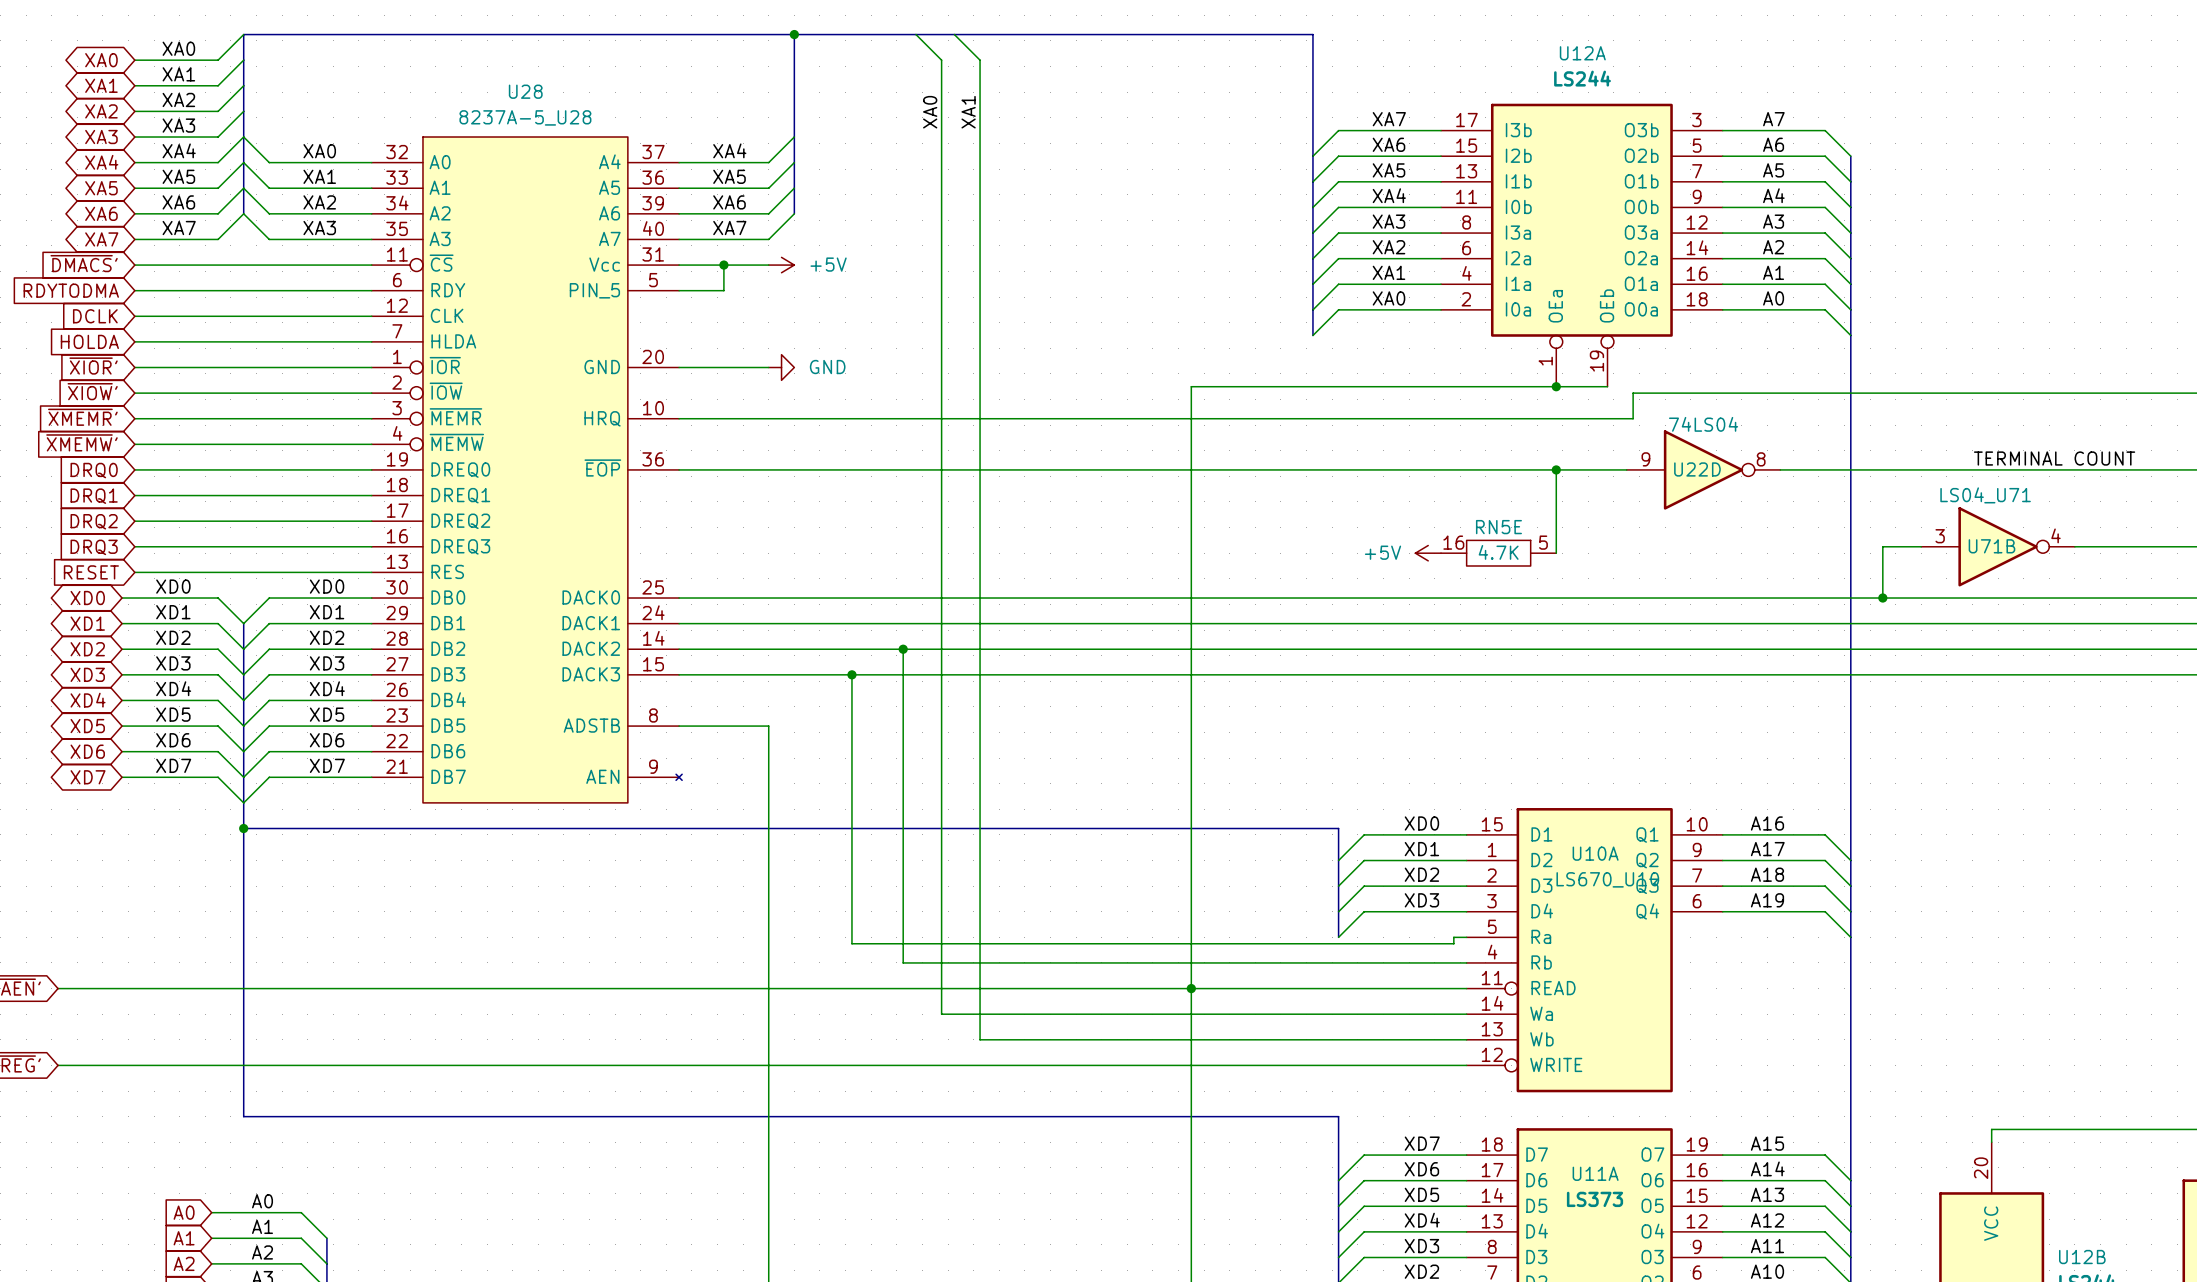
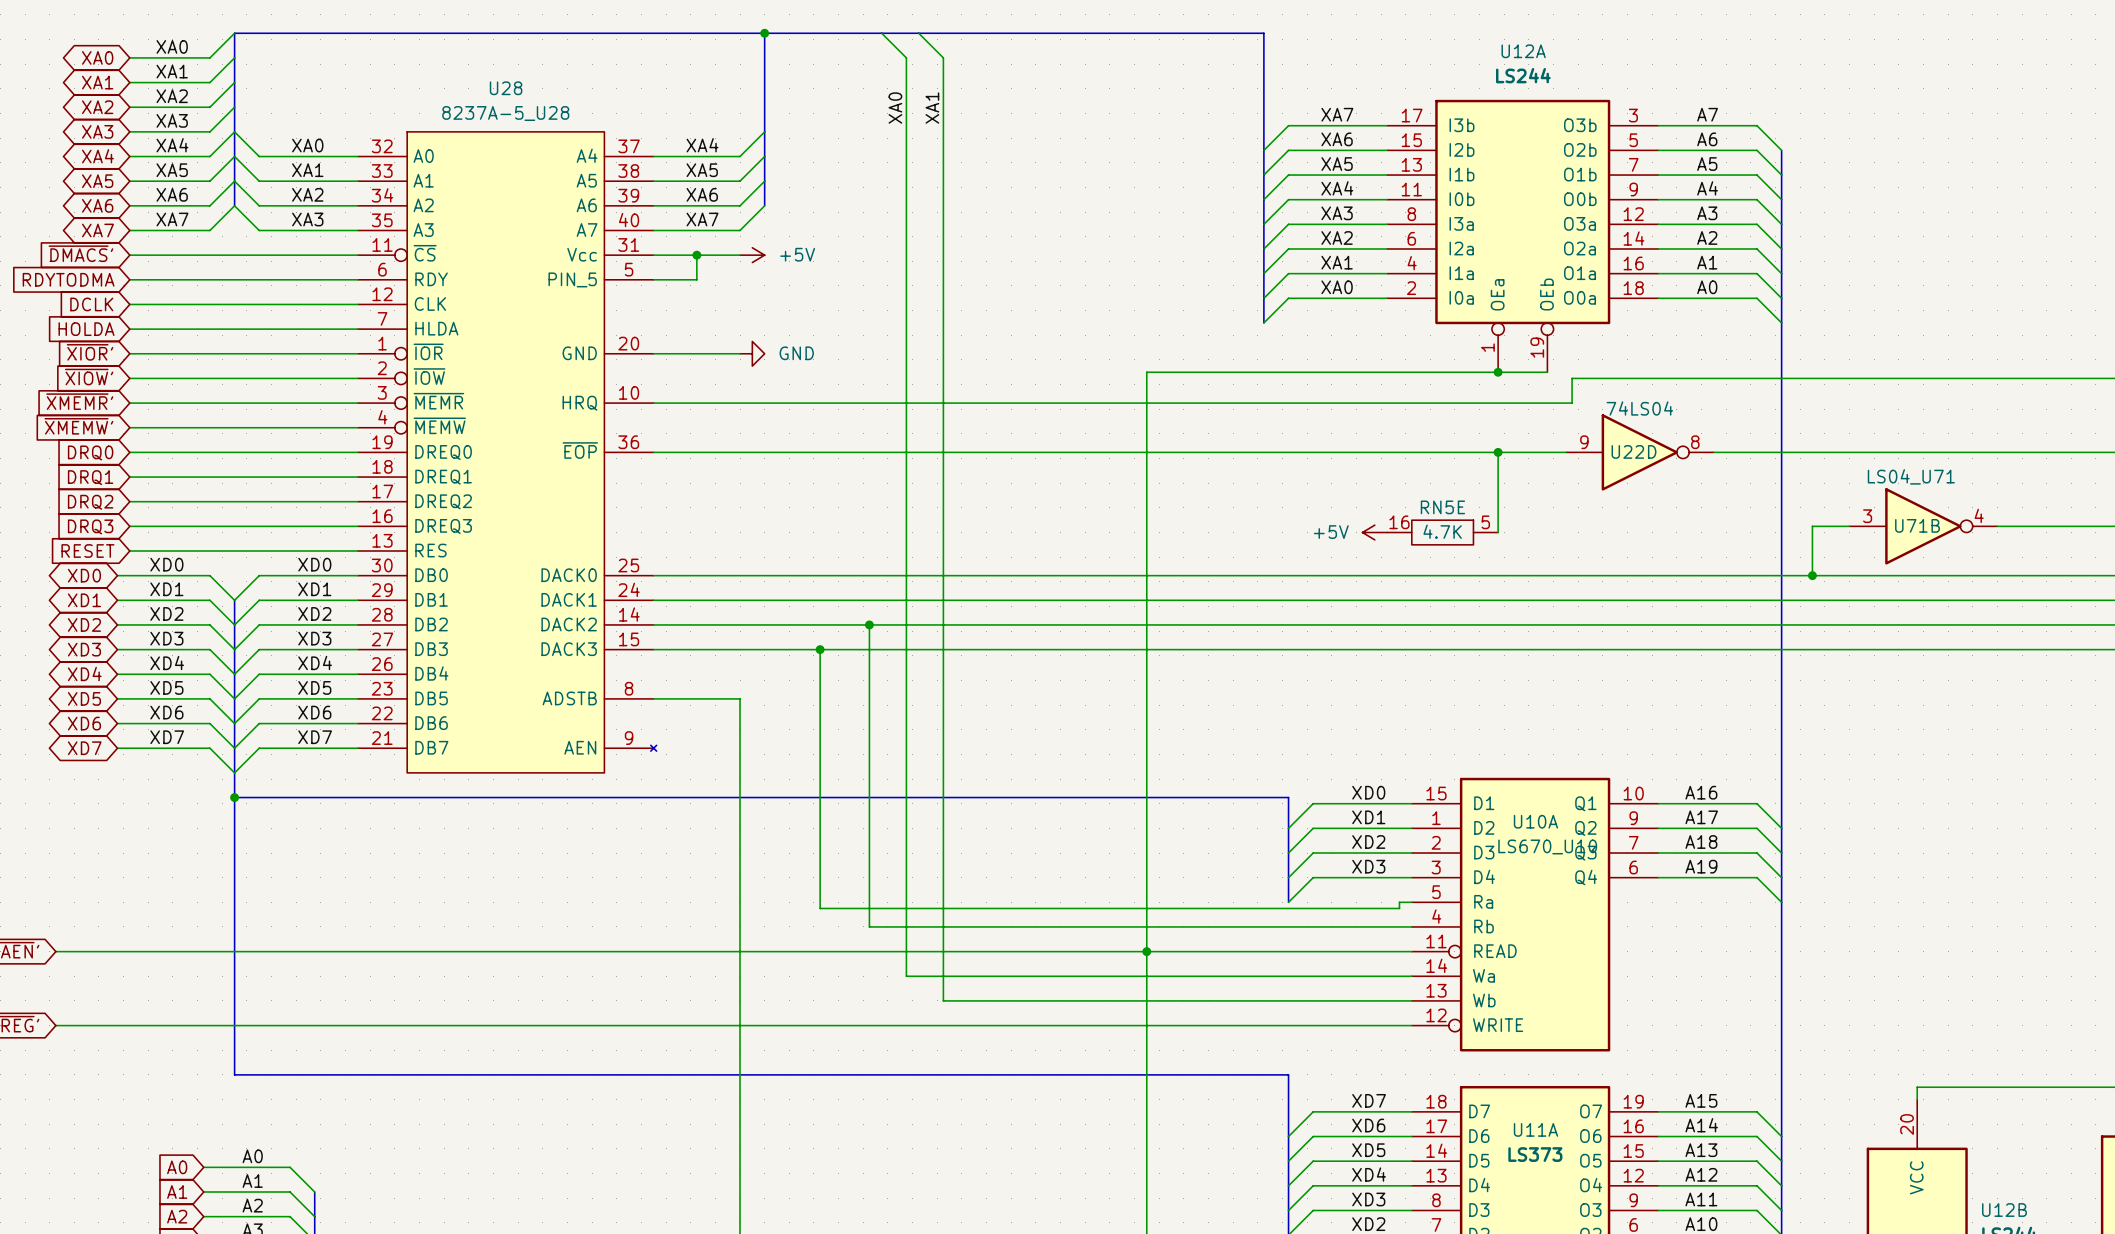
U28 pin number: 36 (653, 177) -> 38 (628, 171)
label: TERMINAL COUNT (2054, 458) -> none

